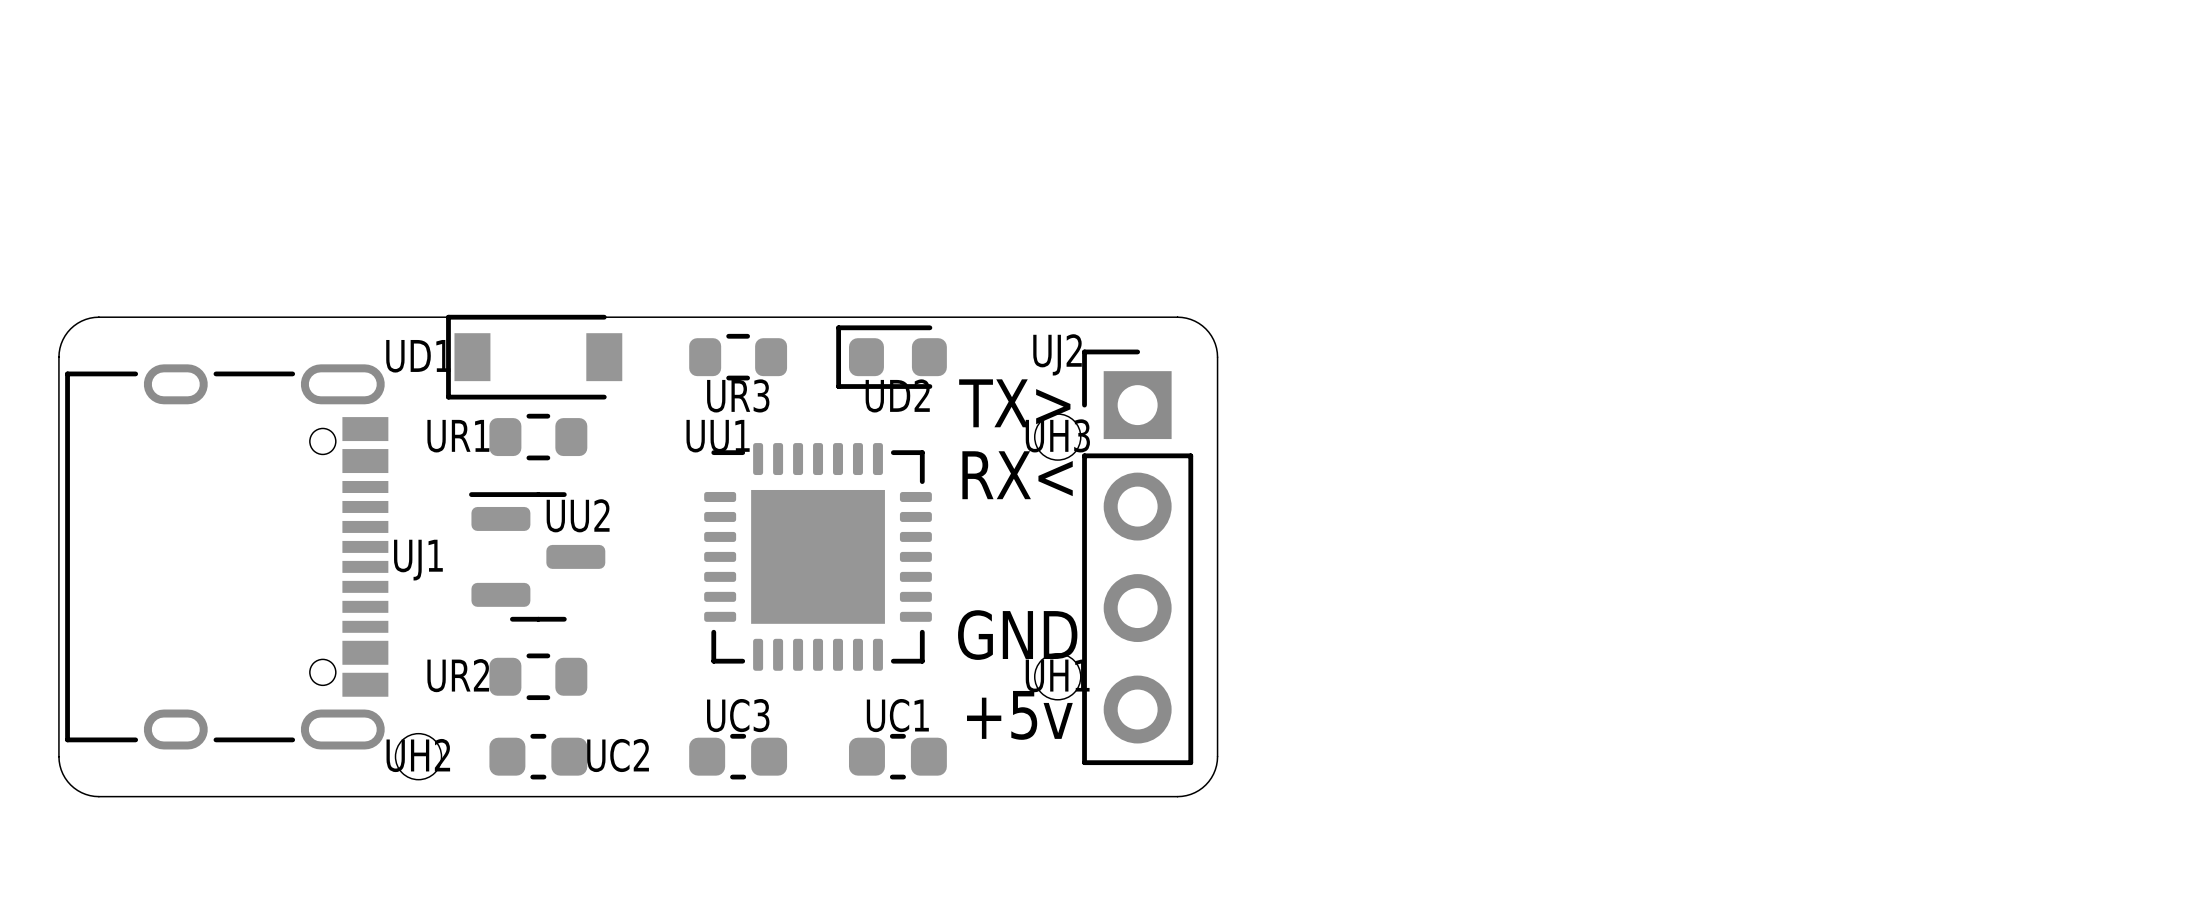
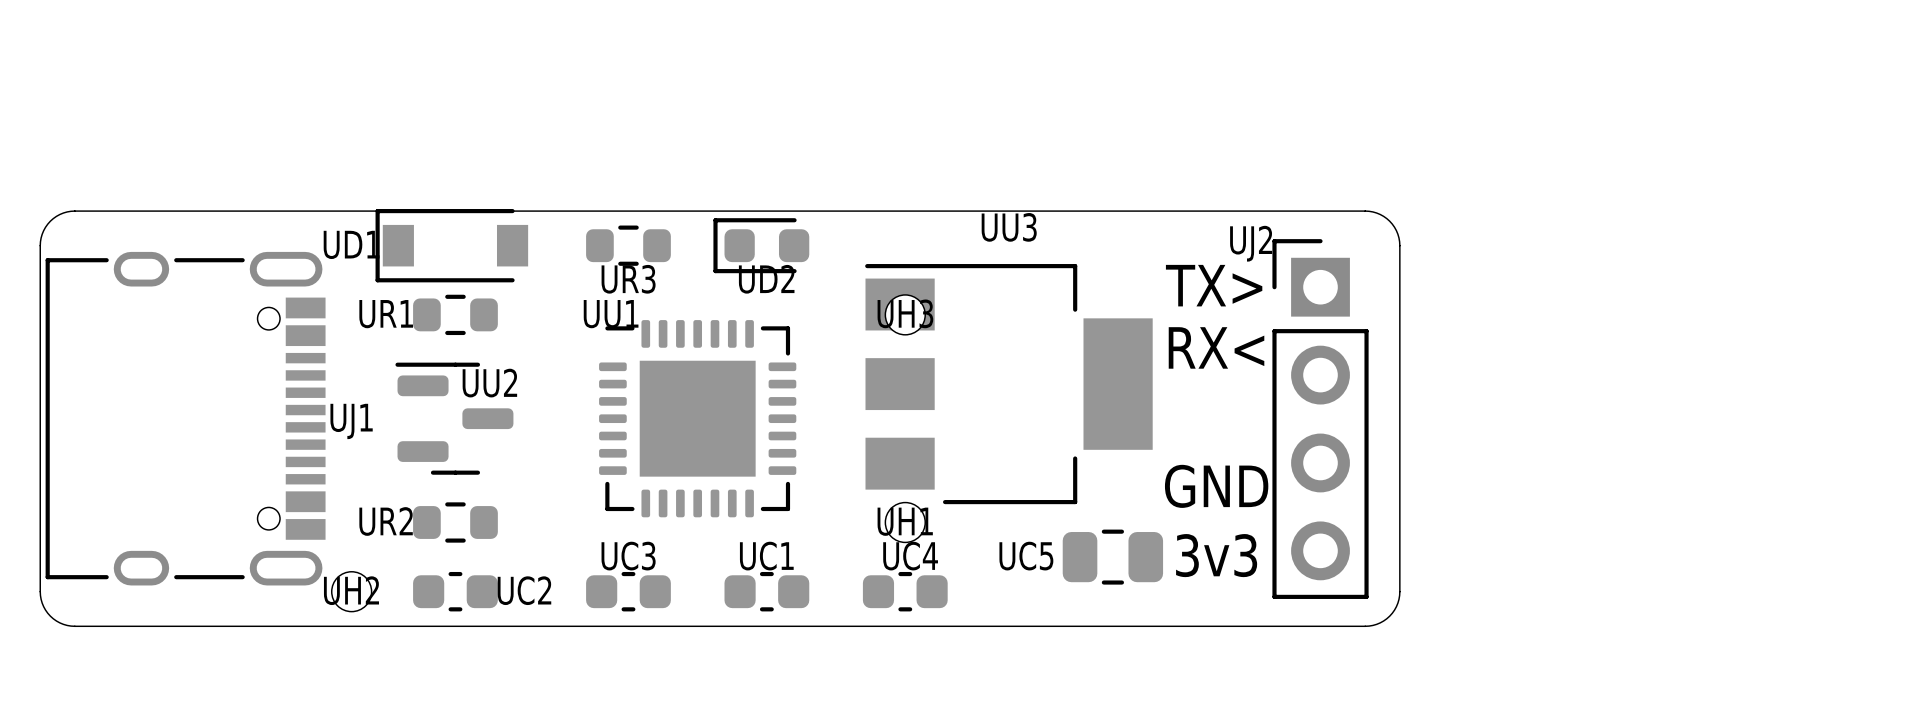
board edge: (1177, 317) (1194, 321) (1205, 328) (1215, 343) (1217, 357) (1217, 761) (1213, 774) (1205, 784) (1194, 792) (1177, 796) -> (1009, 211) (1369, 211) (1383, 216) (1392, 224) (1397, 234) (1399, 245) (1399, 591) (1397, 603) (1389, 616) (1380, 622) (1365, 626) (1009, 626)
text position: TX> (1014, 403) -> TX> (1214, 285)
text position: RX< (1017, 475) -> RX< (1216, 347)
UU3: none -> (1008, 384)
UJ2 position: (1137, 557) -> (1320, 419)
text position: GND (1017, 635) -> GND (1216, 486)
text: none -> 3v3 (1216, 555)
text: +5v (1019, 715) -> none
UC5: none -> (1112, 557)
UC4: none -> (905, 591)

